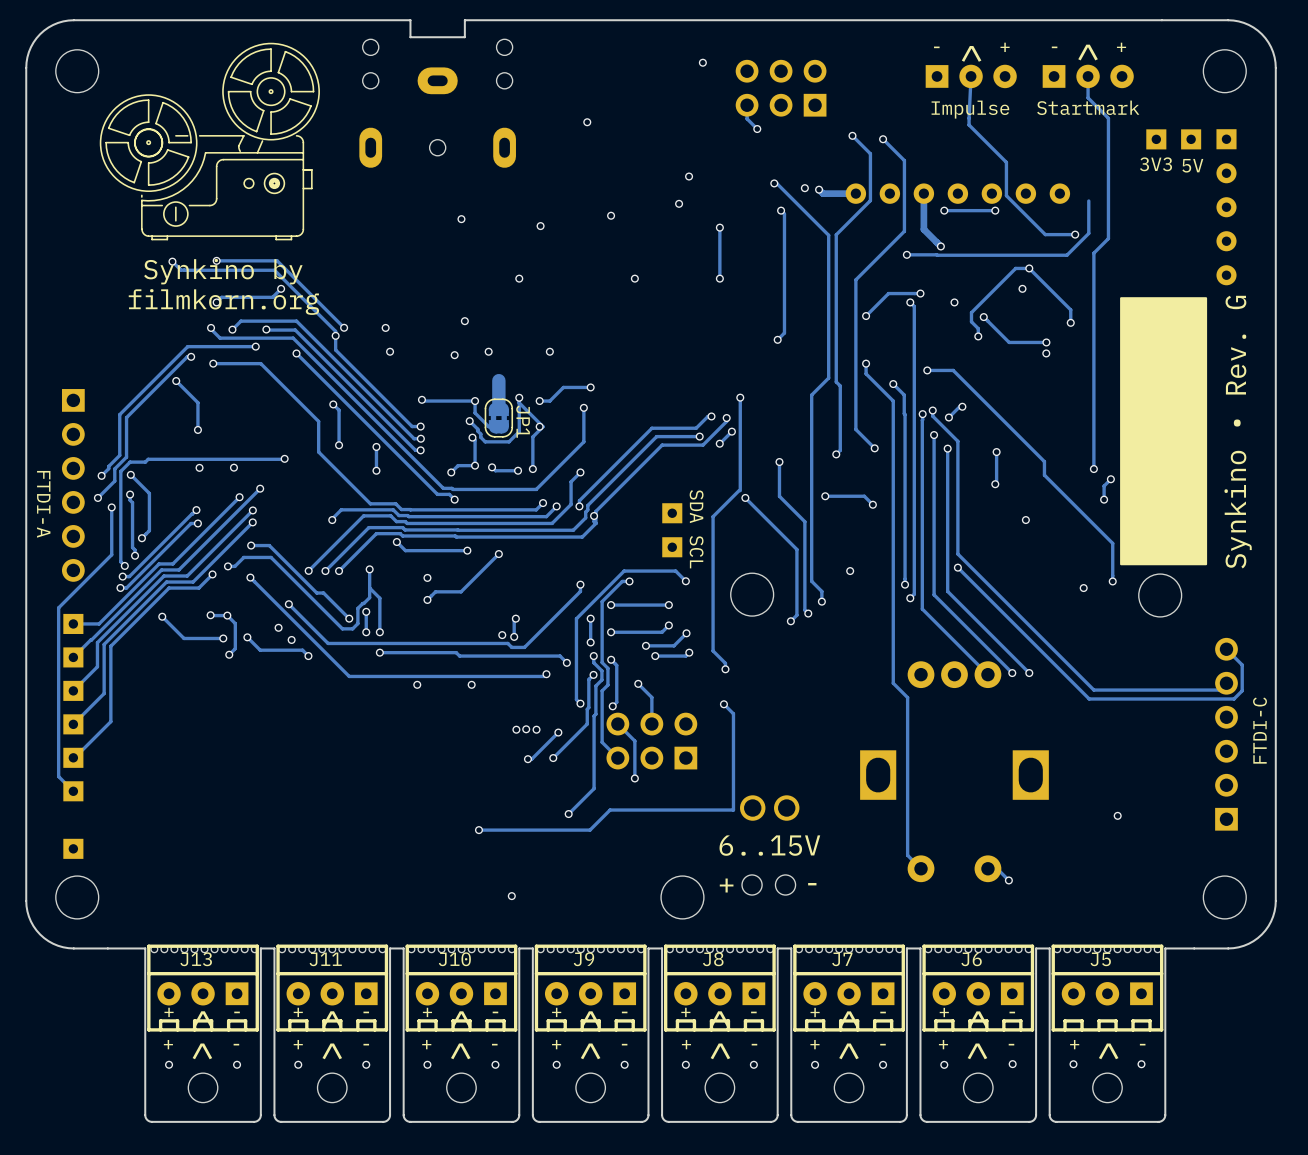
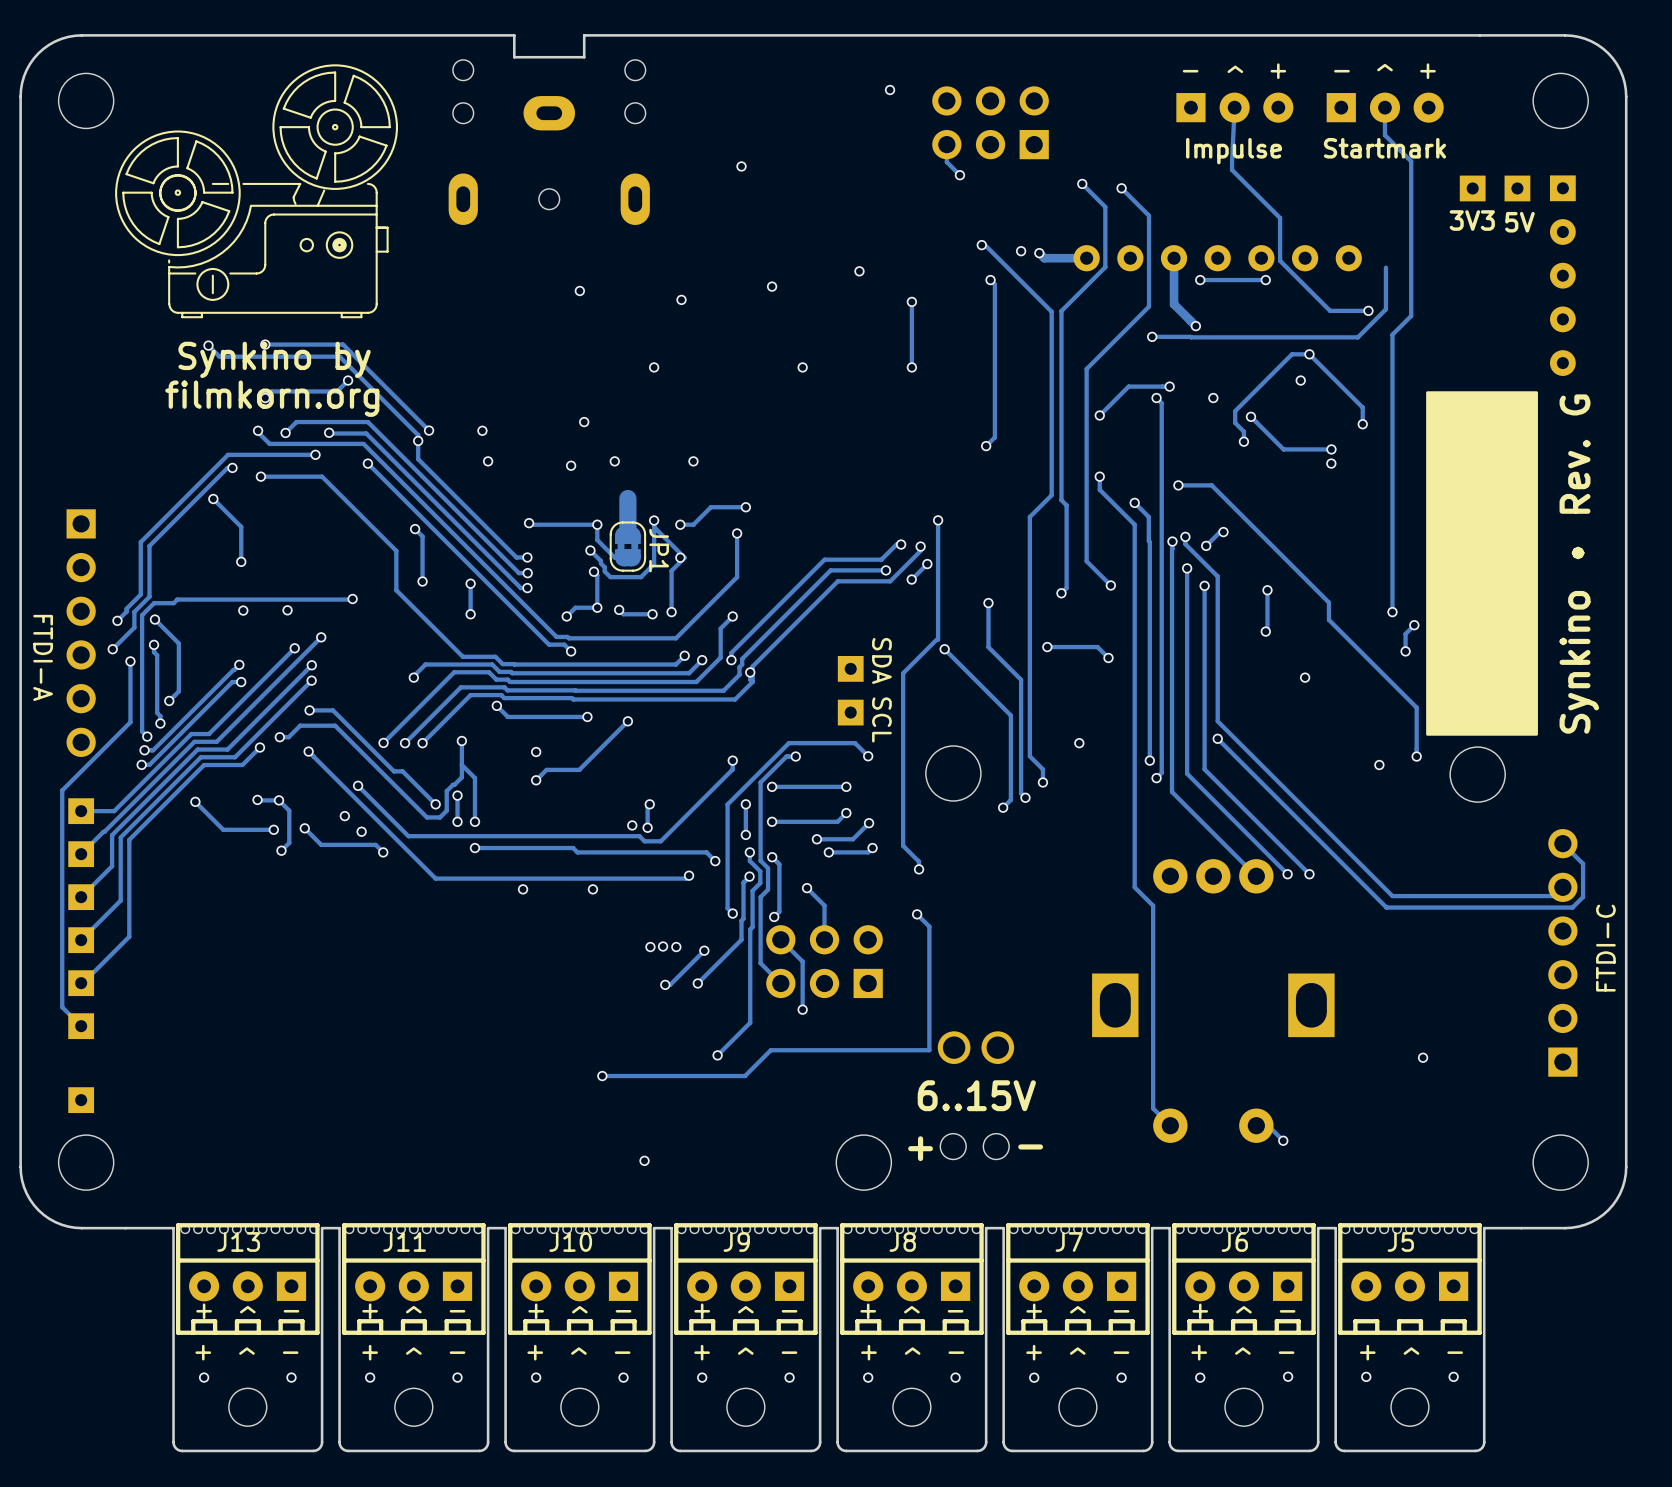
via: (689, 176) -> none

